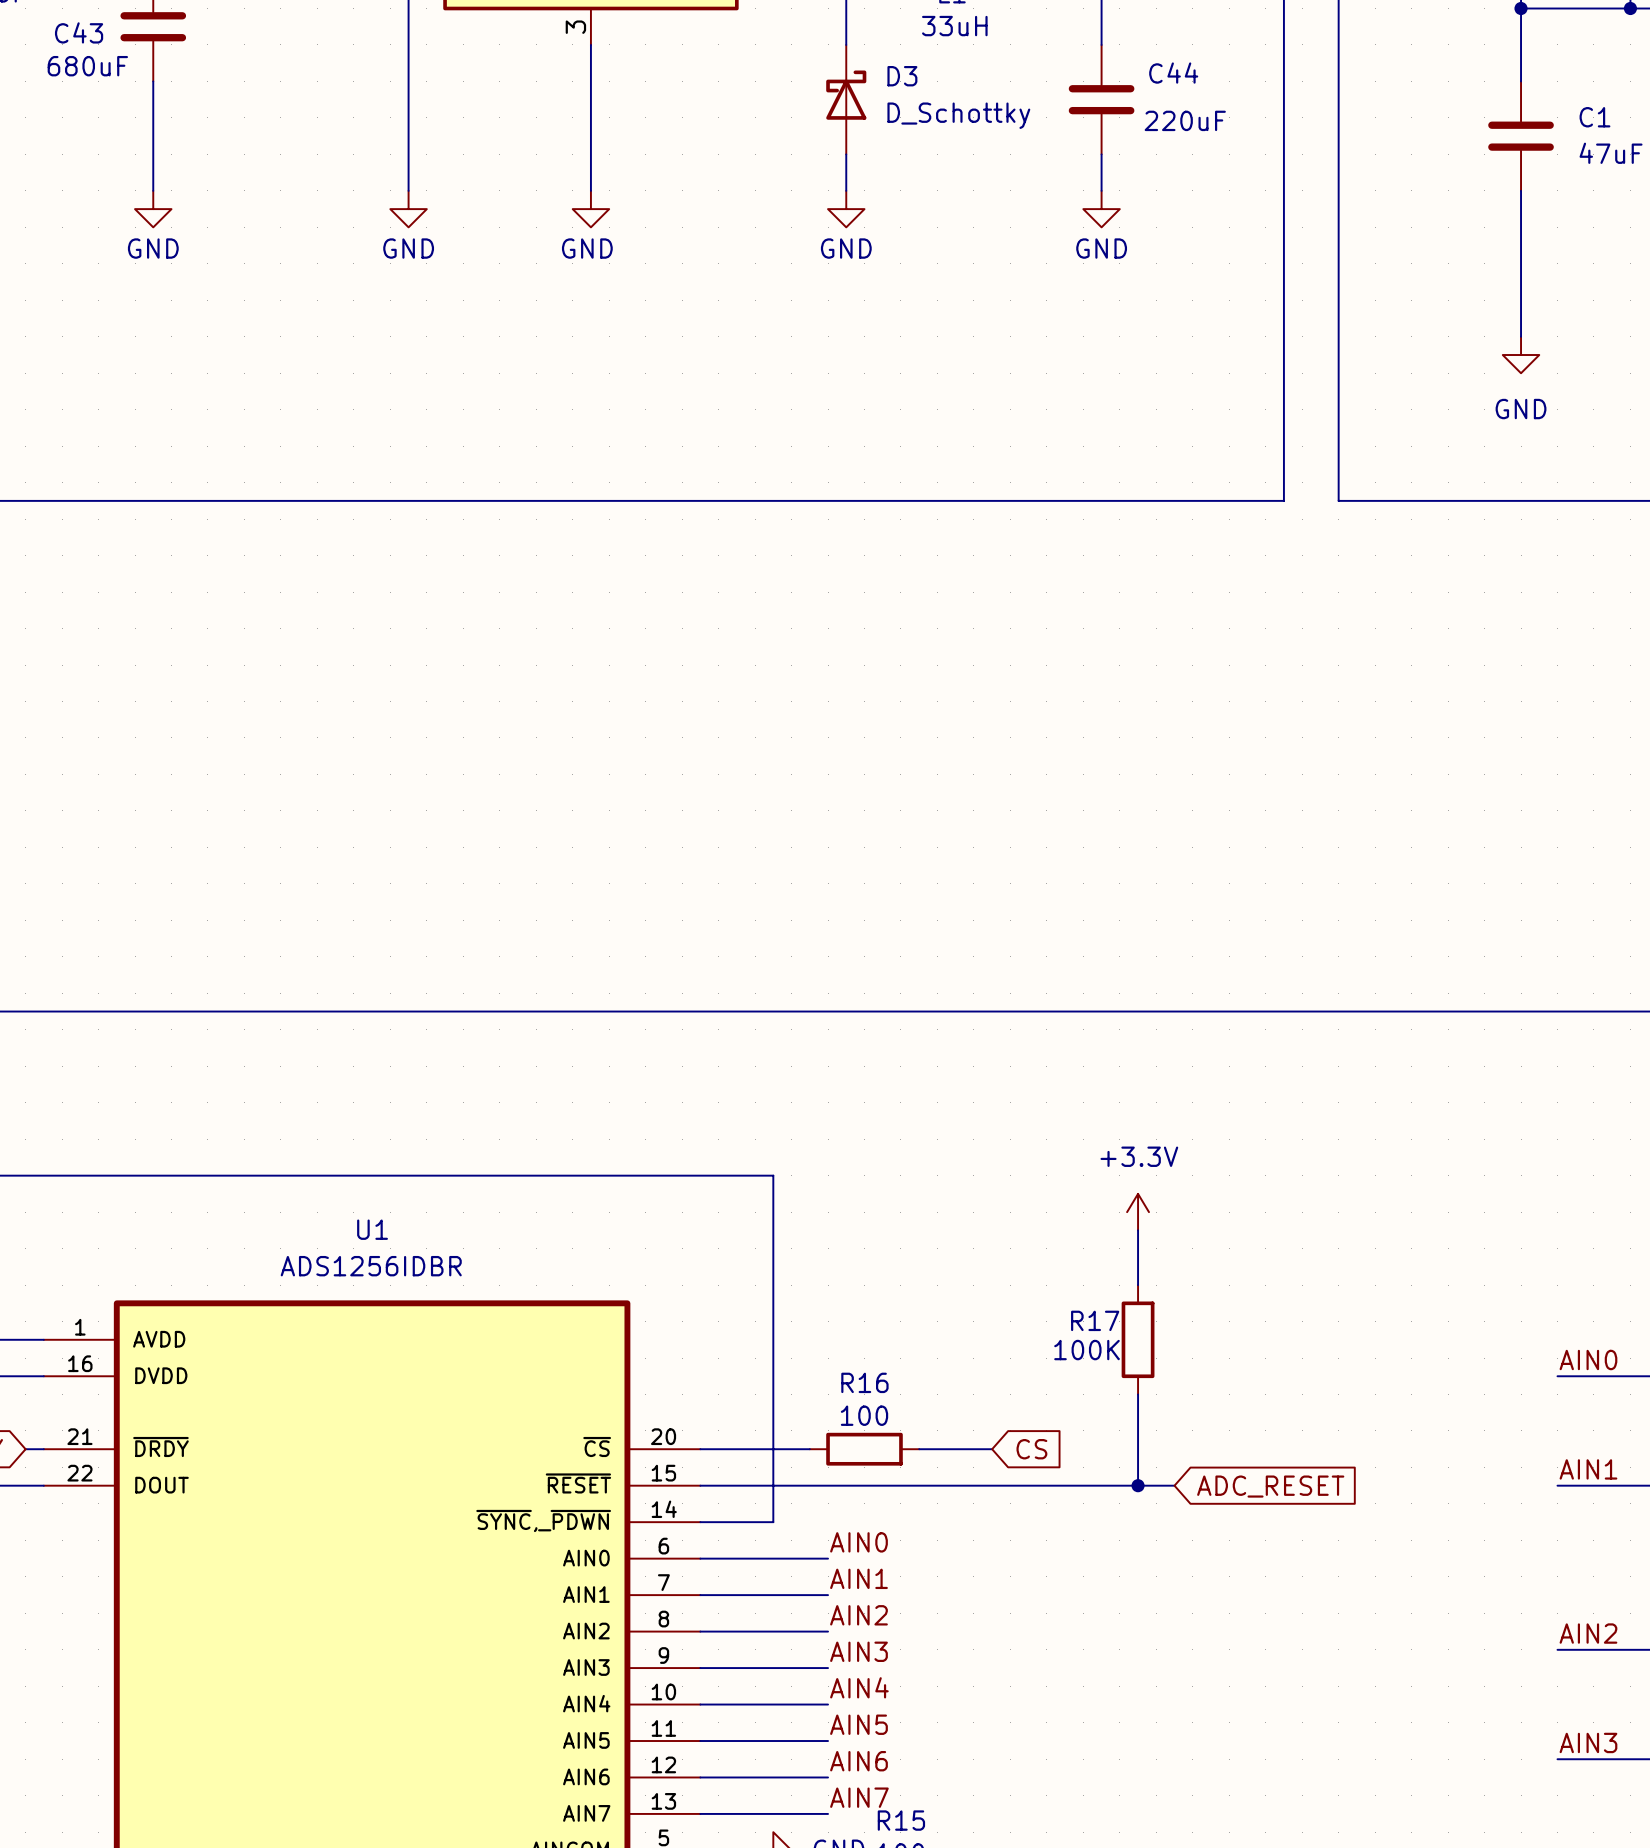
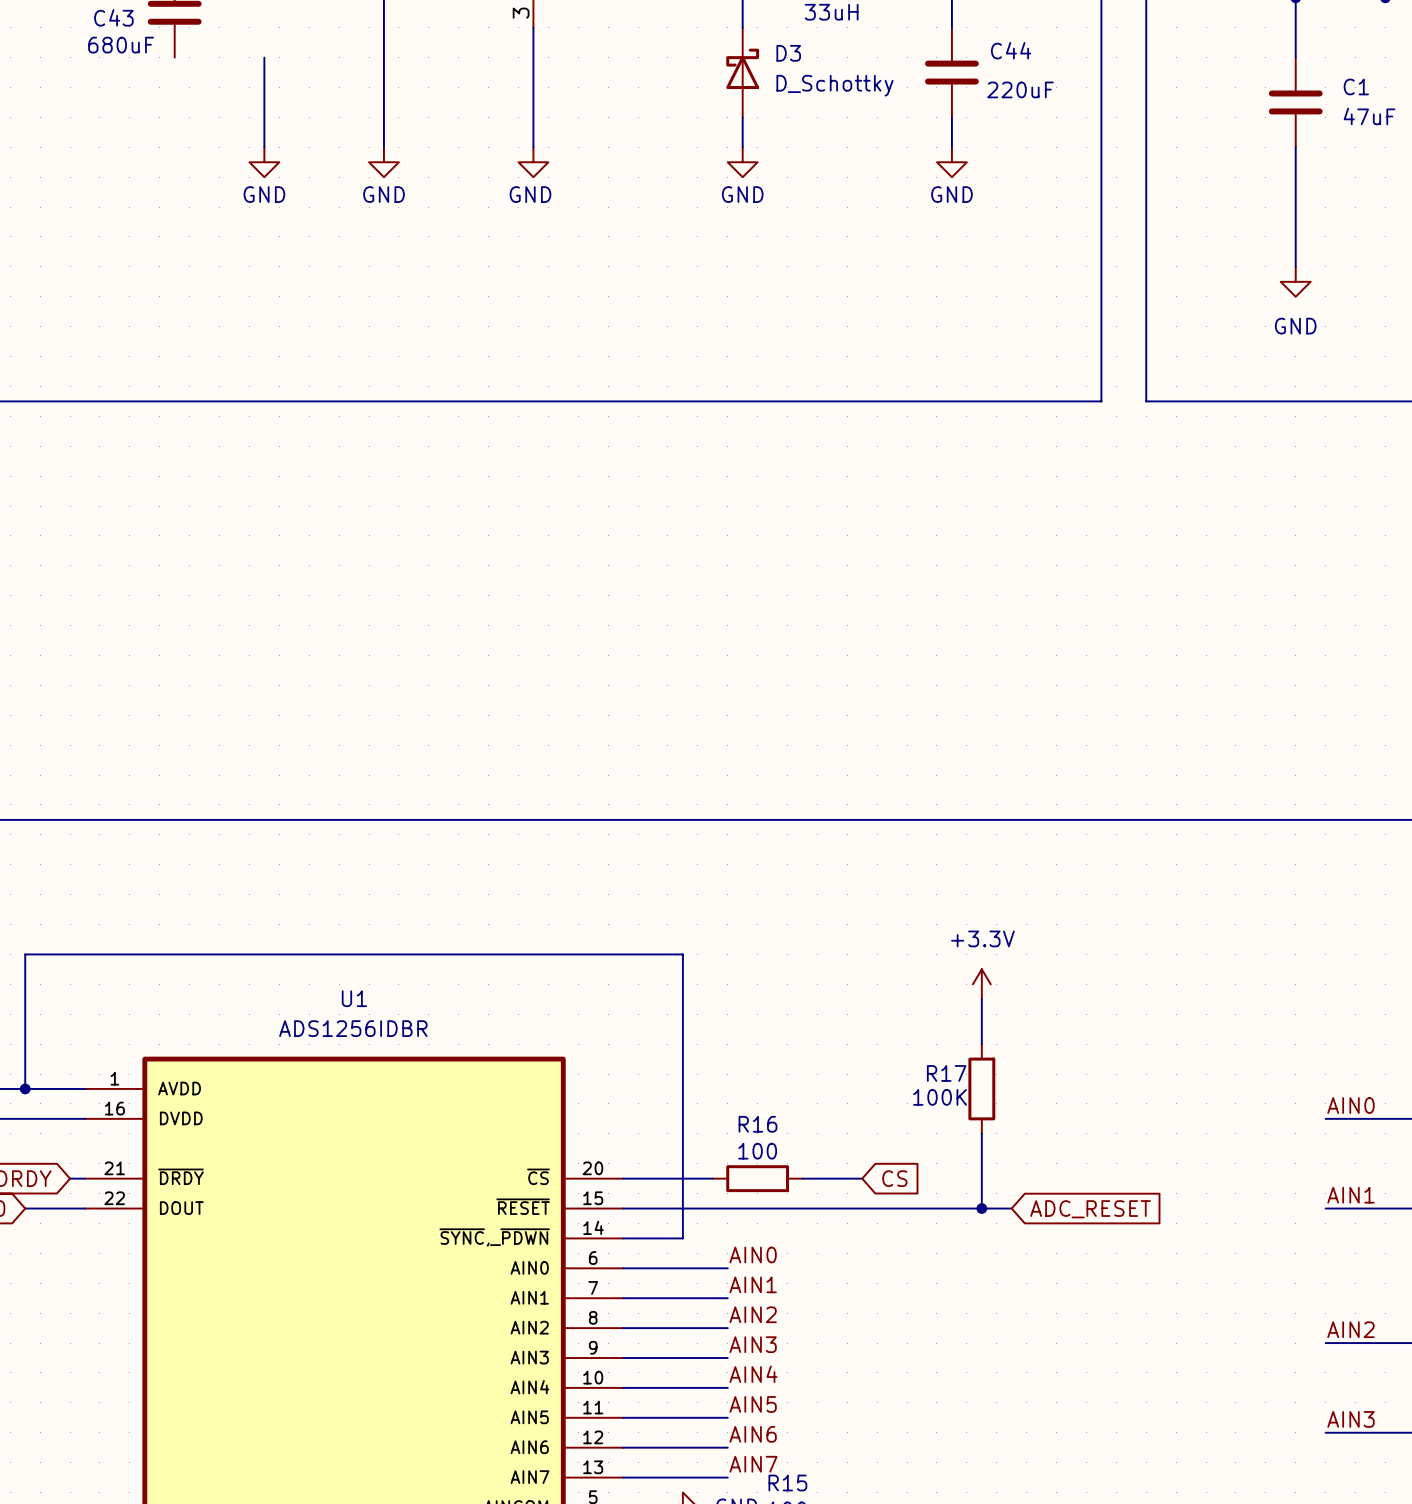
wire: (153, 81) (153, 190) -> (264, 57) (264, 147)
power symbol position: GND (153, 209) -> GND (264, 162)

